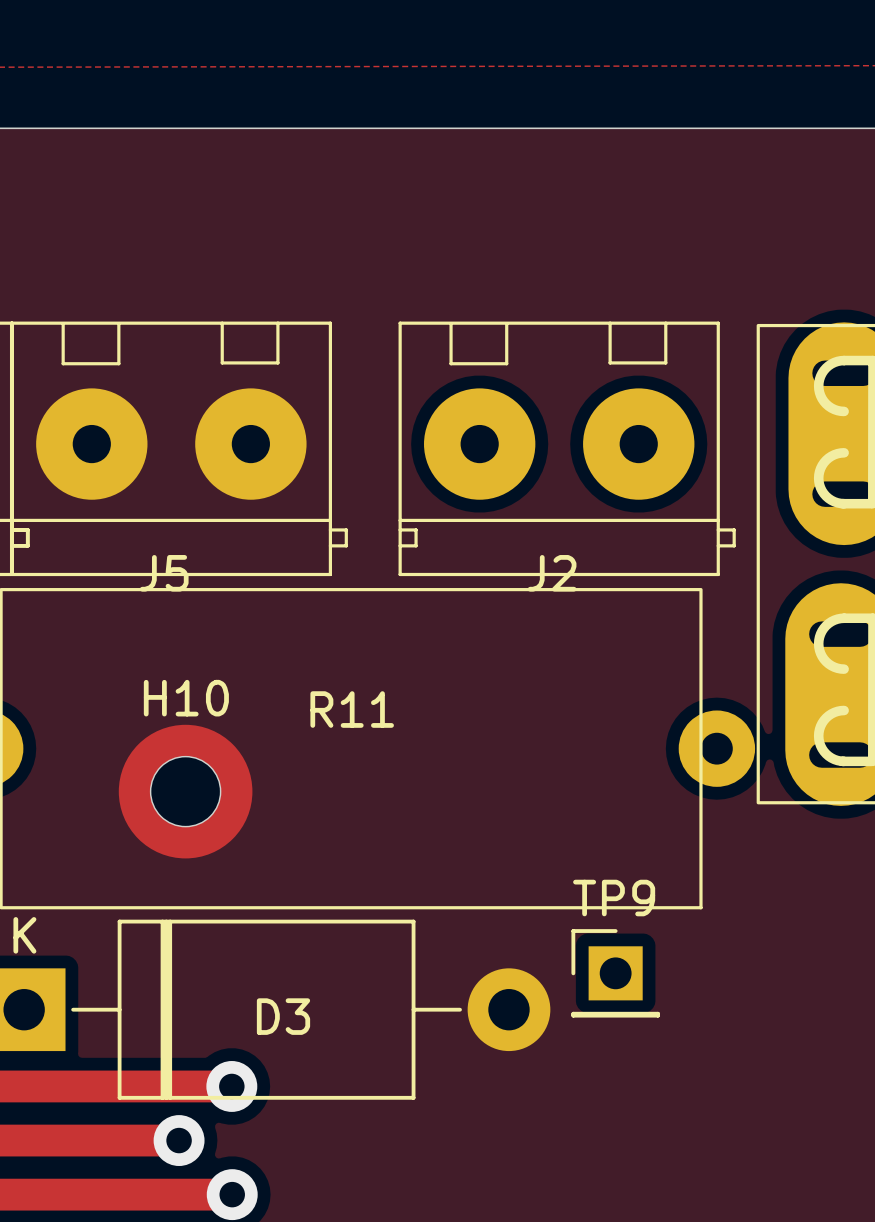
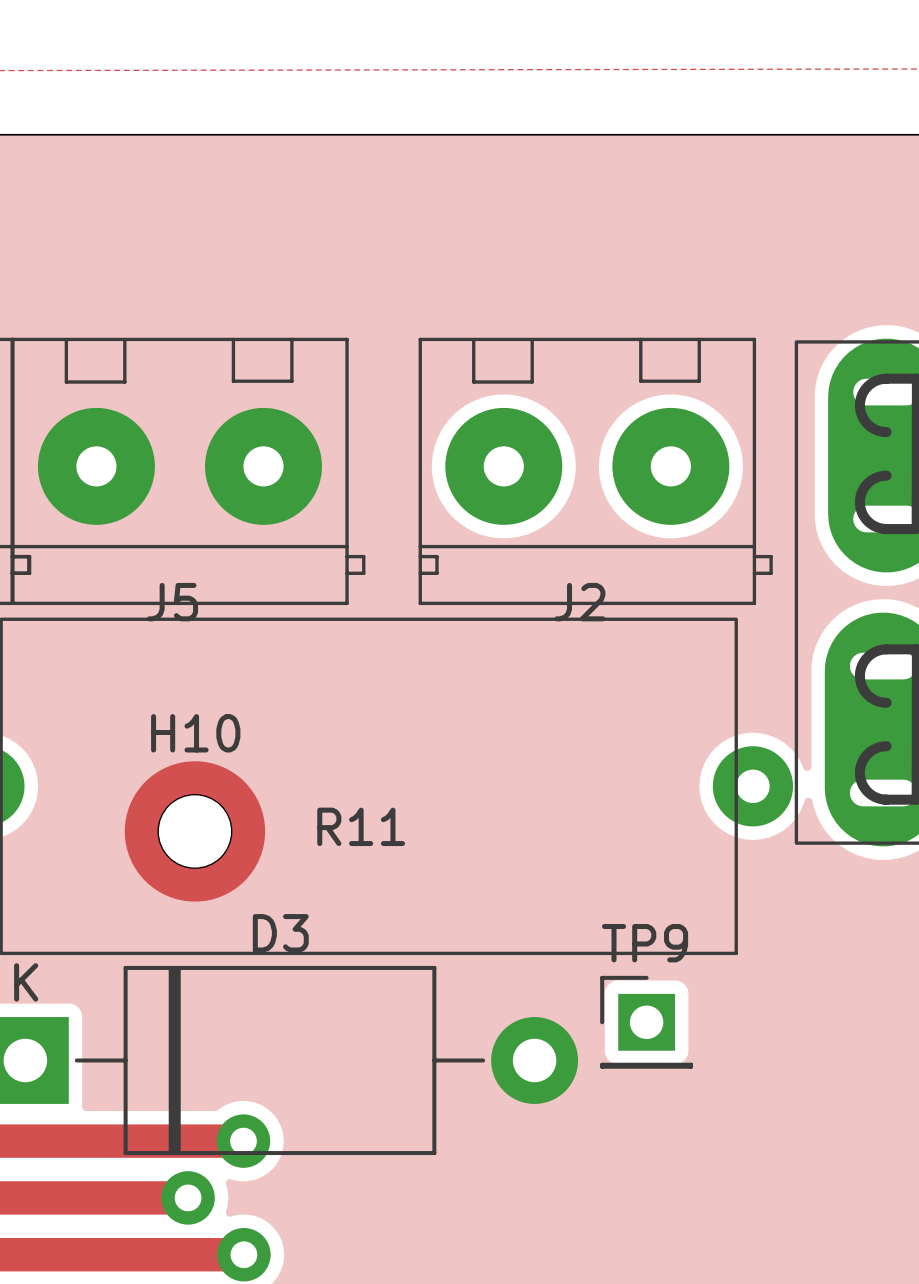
R11 name position: R11 (352, 709) -> R11 (361, 826)
D3 name position: D3 (283, 1016) -> D3 (280, 933)

